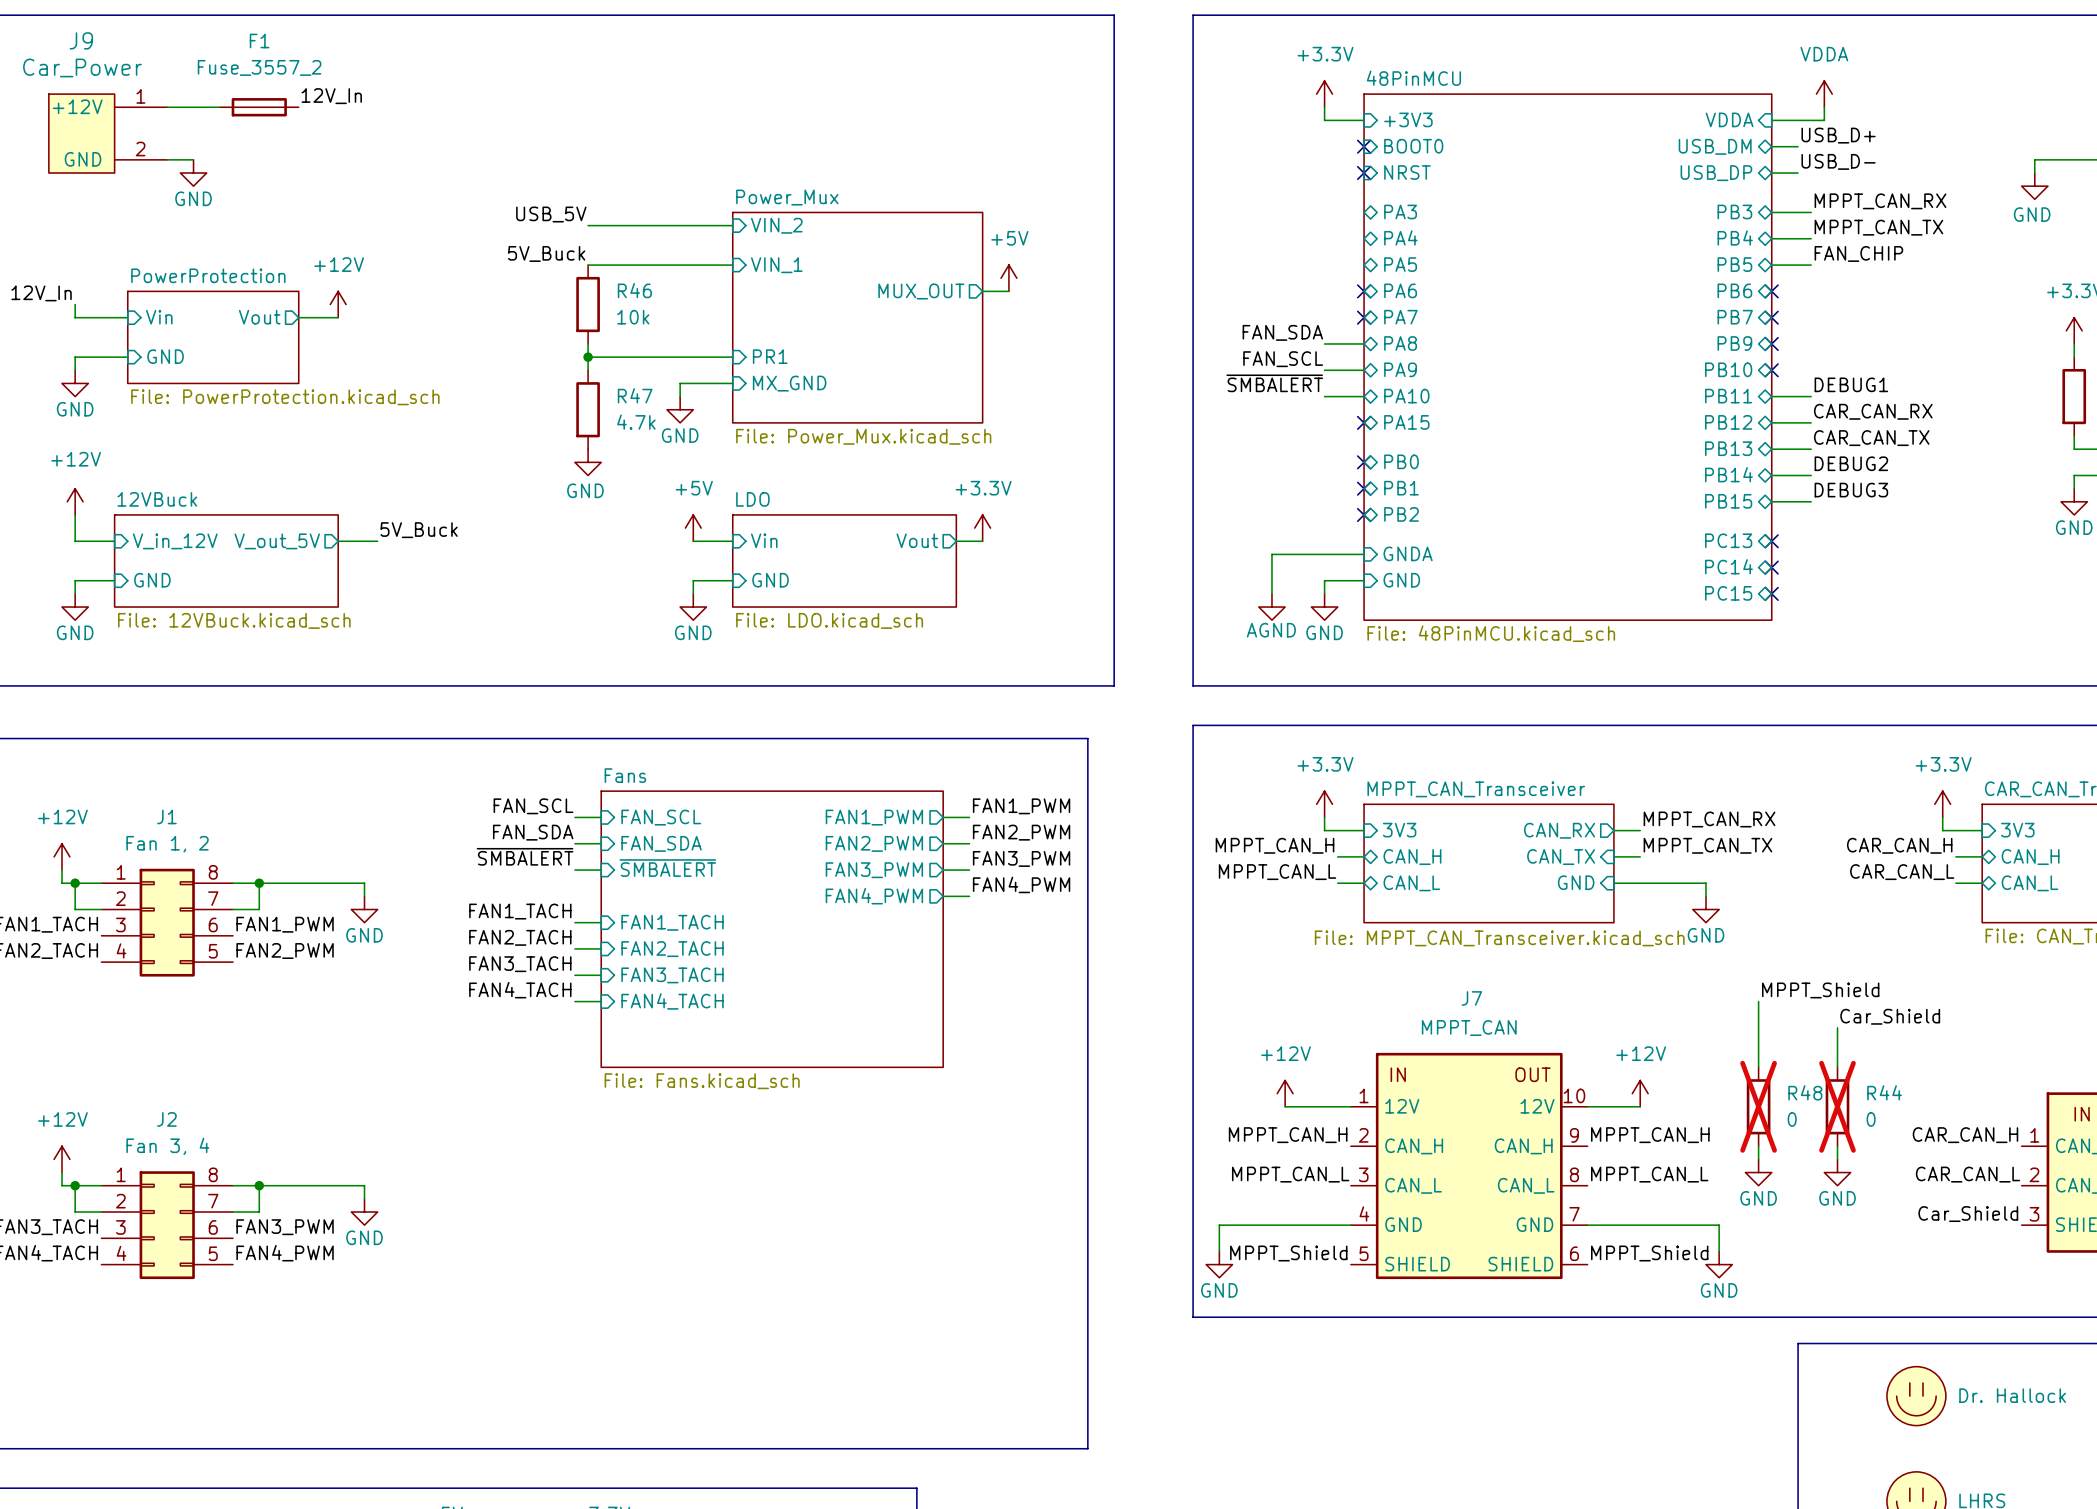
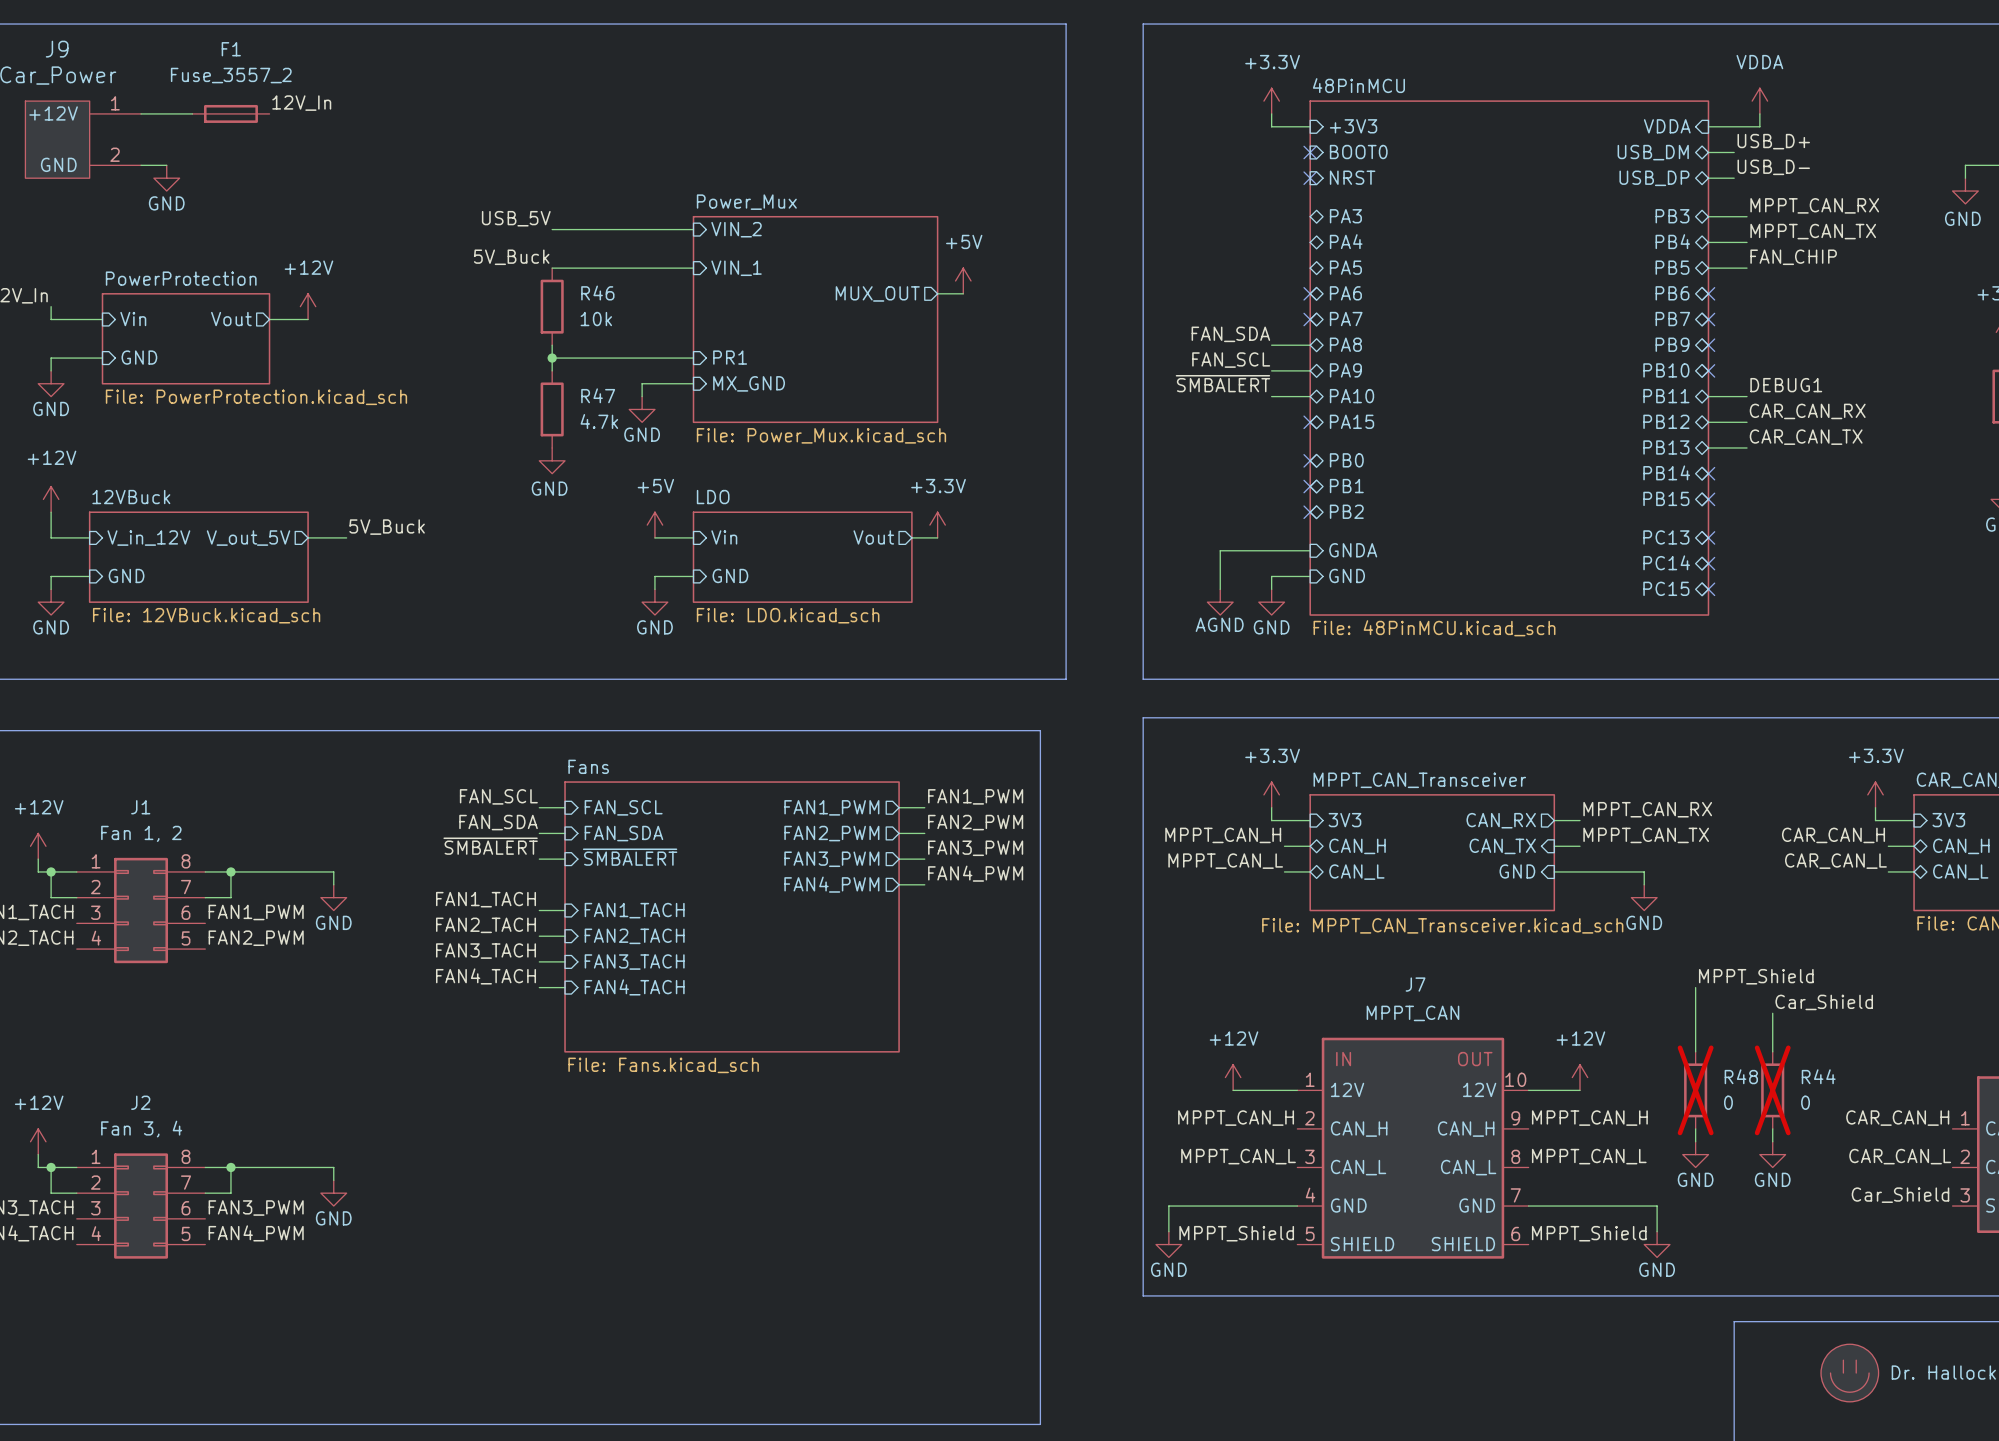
label: DEBUG2 (1851, 463) -> none
wire: (1771, 475) (1811, 475) -> none
no-connect mark: none -> (1708, 473)
label: DEBUG3 (1851, 490) -> none
wire: (1771, 501) (1811, 501) -> none
no-connect mark: none -> (1708, 499)

